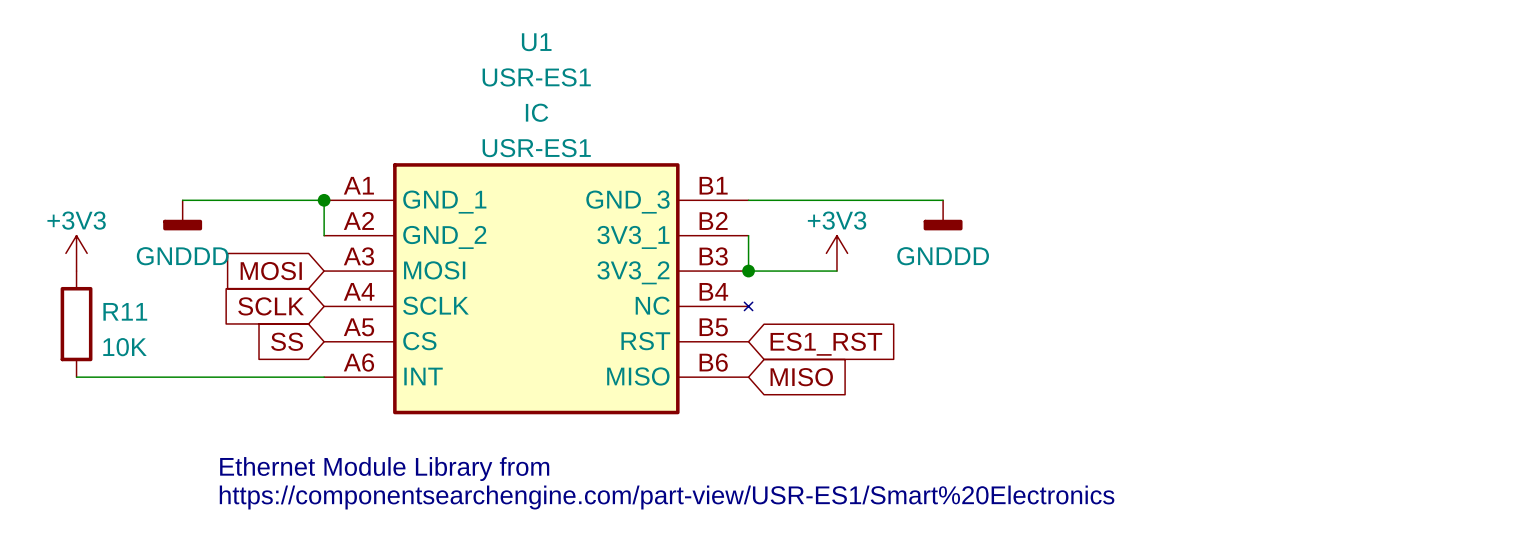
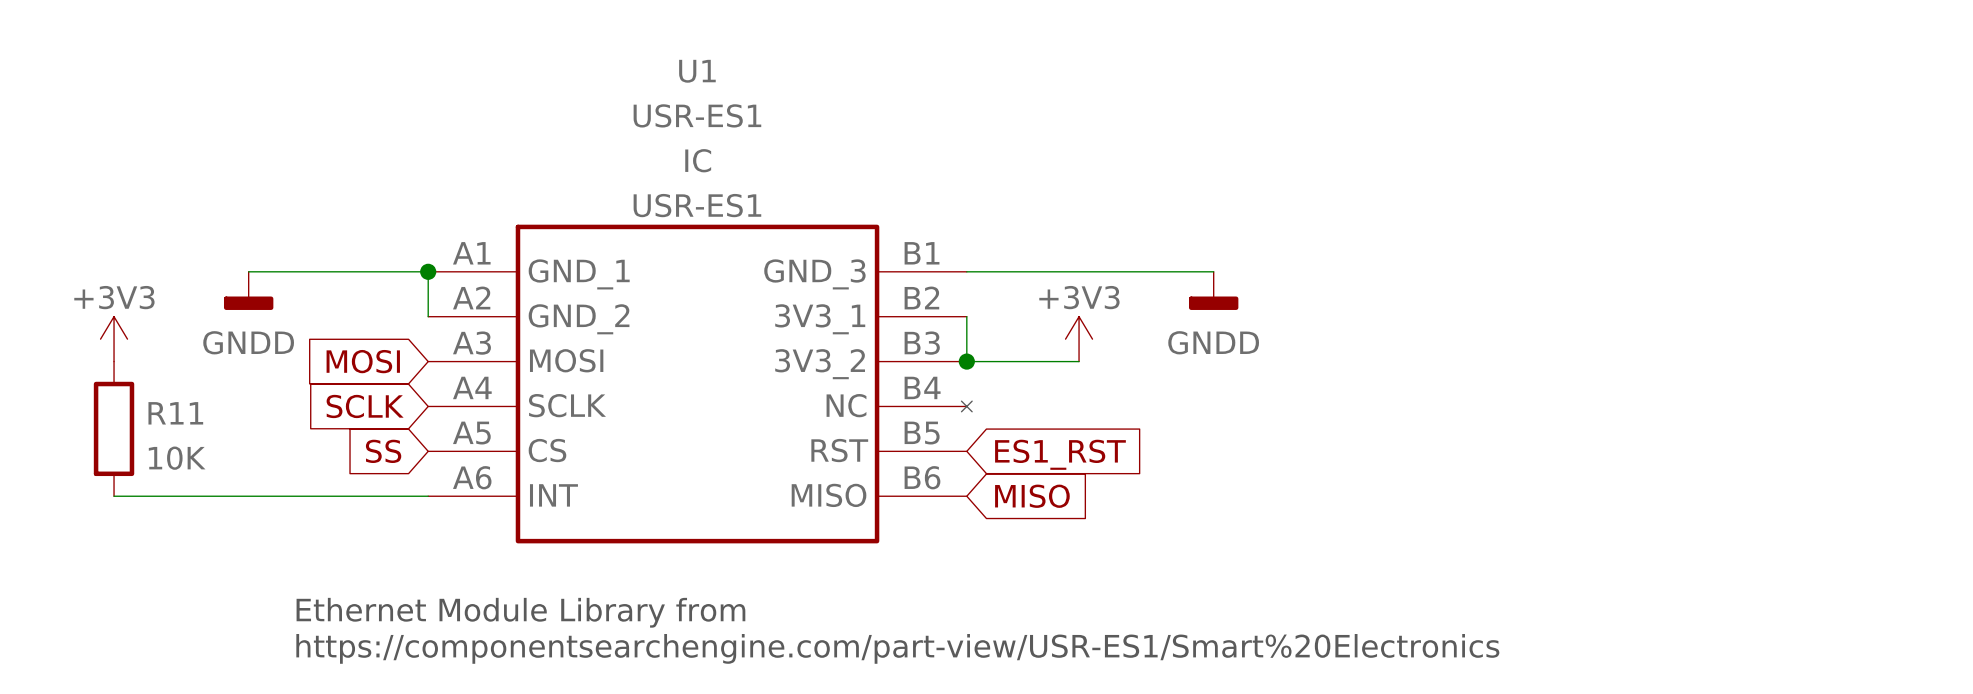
power symbol: GNDDD (182, 215) -> GNDD (248, 290)
power symbol: GNDDD (943, 215) -> GNDD (1213, 290)

